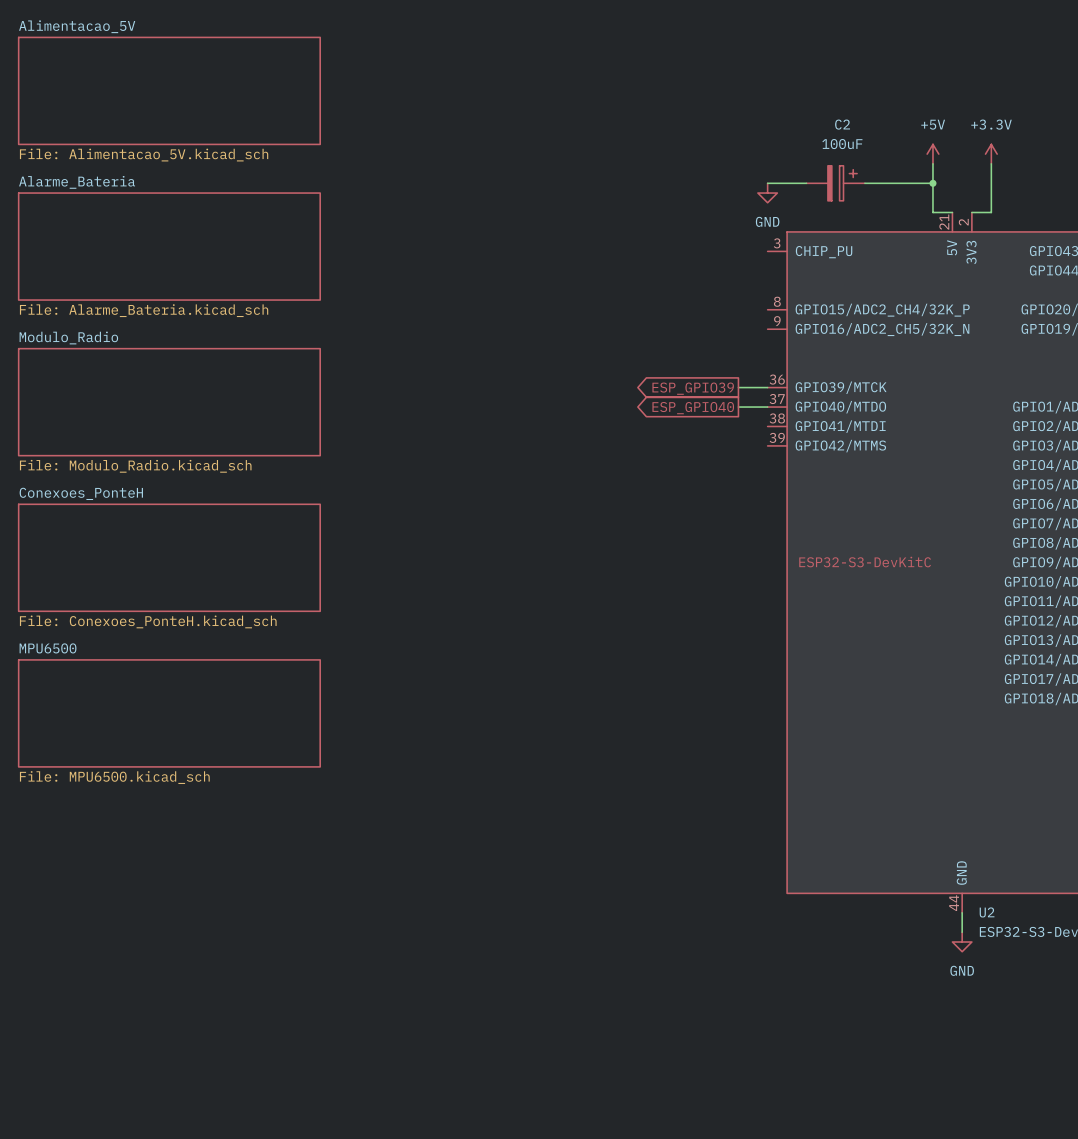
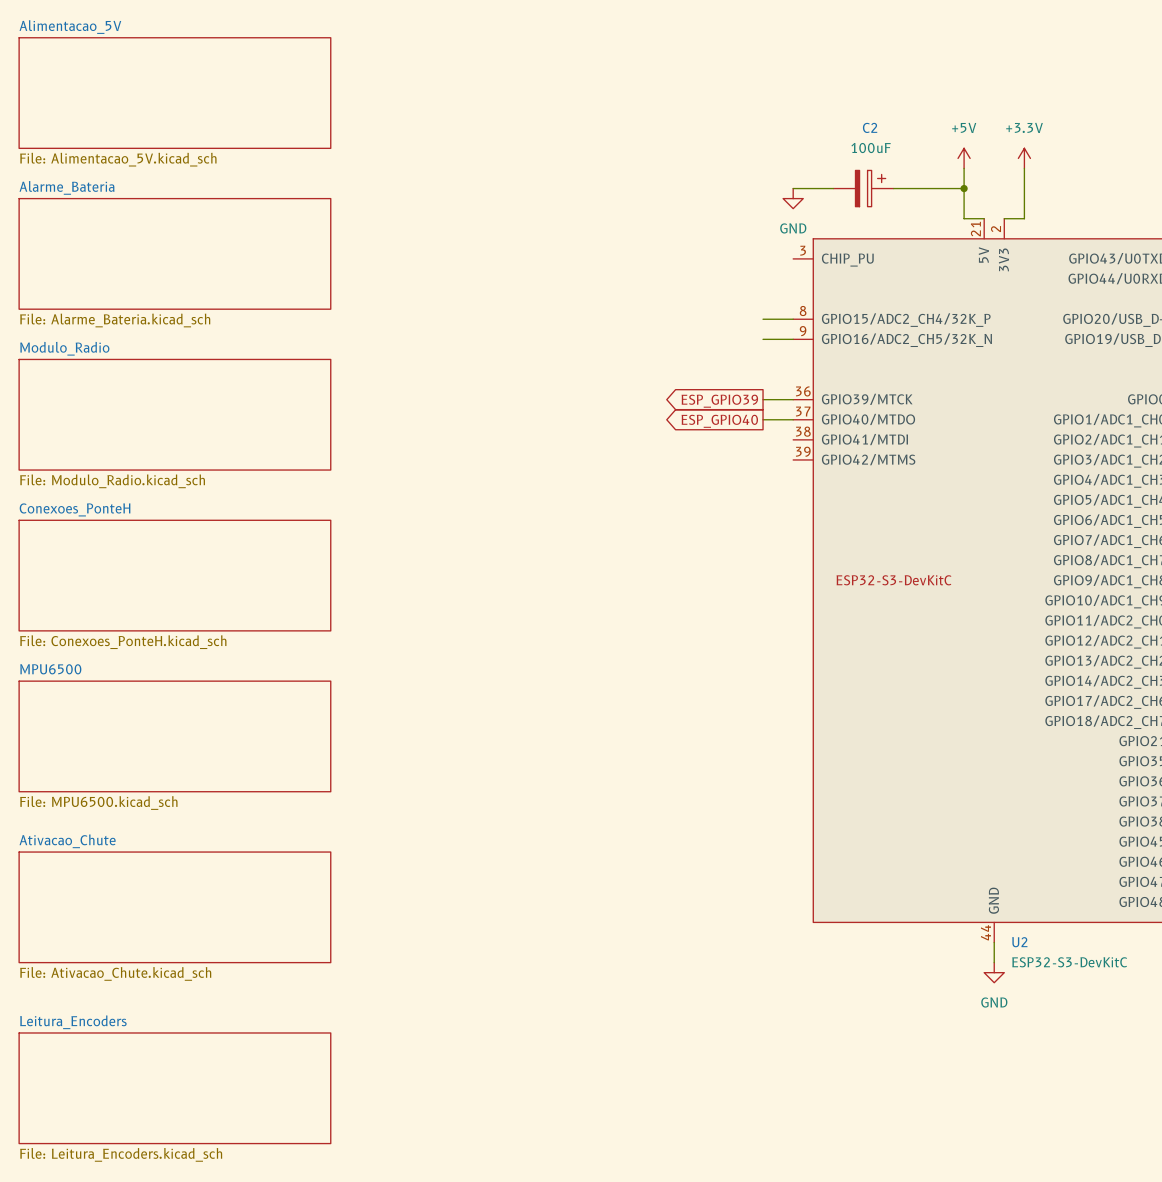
wire: none -> (763, 319) (793, 319)
wire: none -> (763, 339) (793, 339)
sheet Ativacao_Chute: none -> File: Ativacao_Chute.kicad_sch (174, 907)
sheet Leitura_Encoders: none -> File: Leitura_Encoders.kicad_sch (174, 1088)

